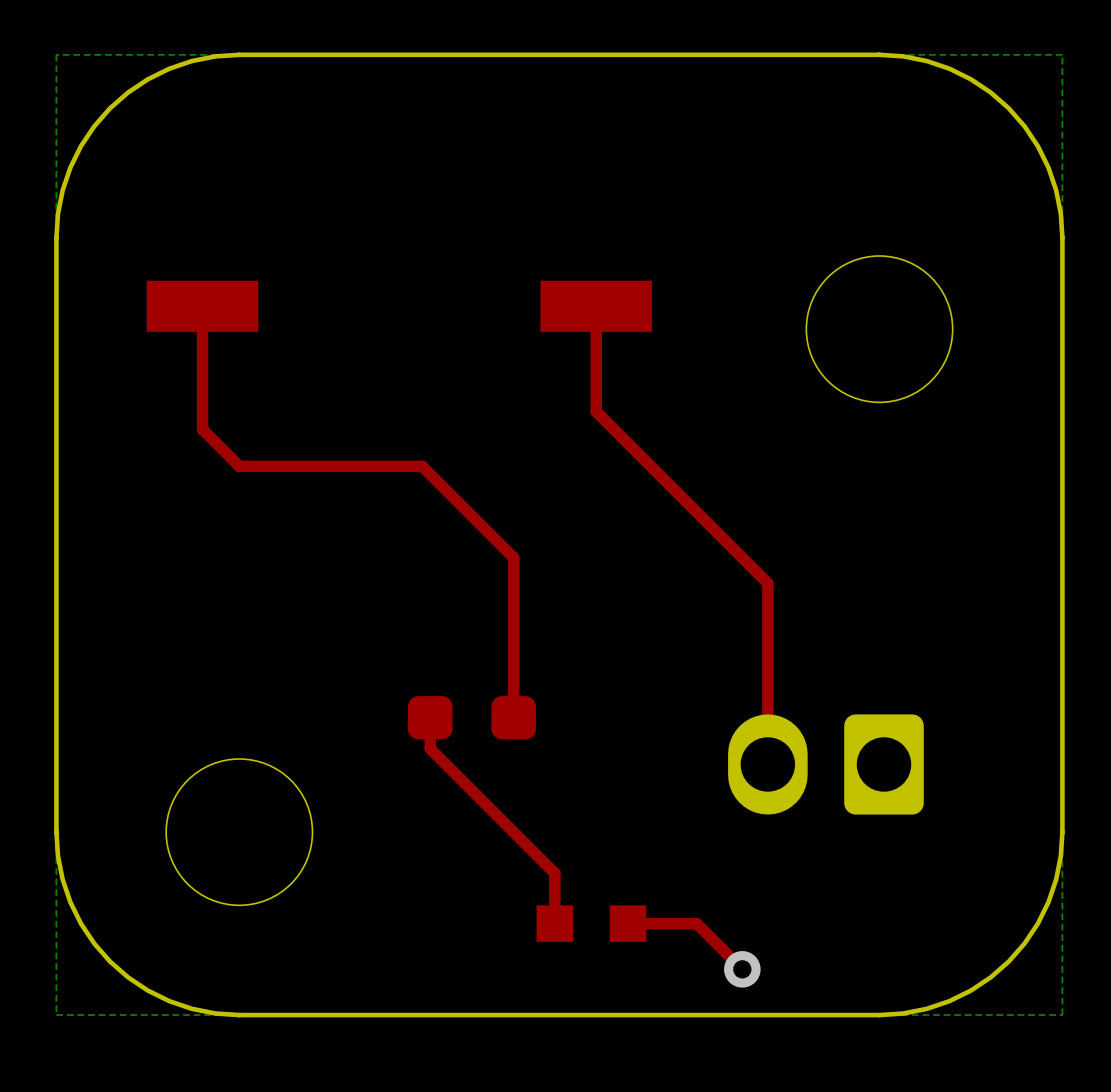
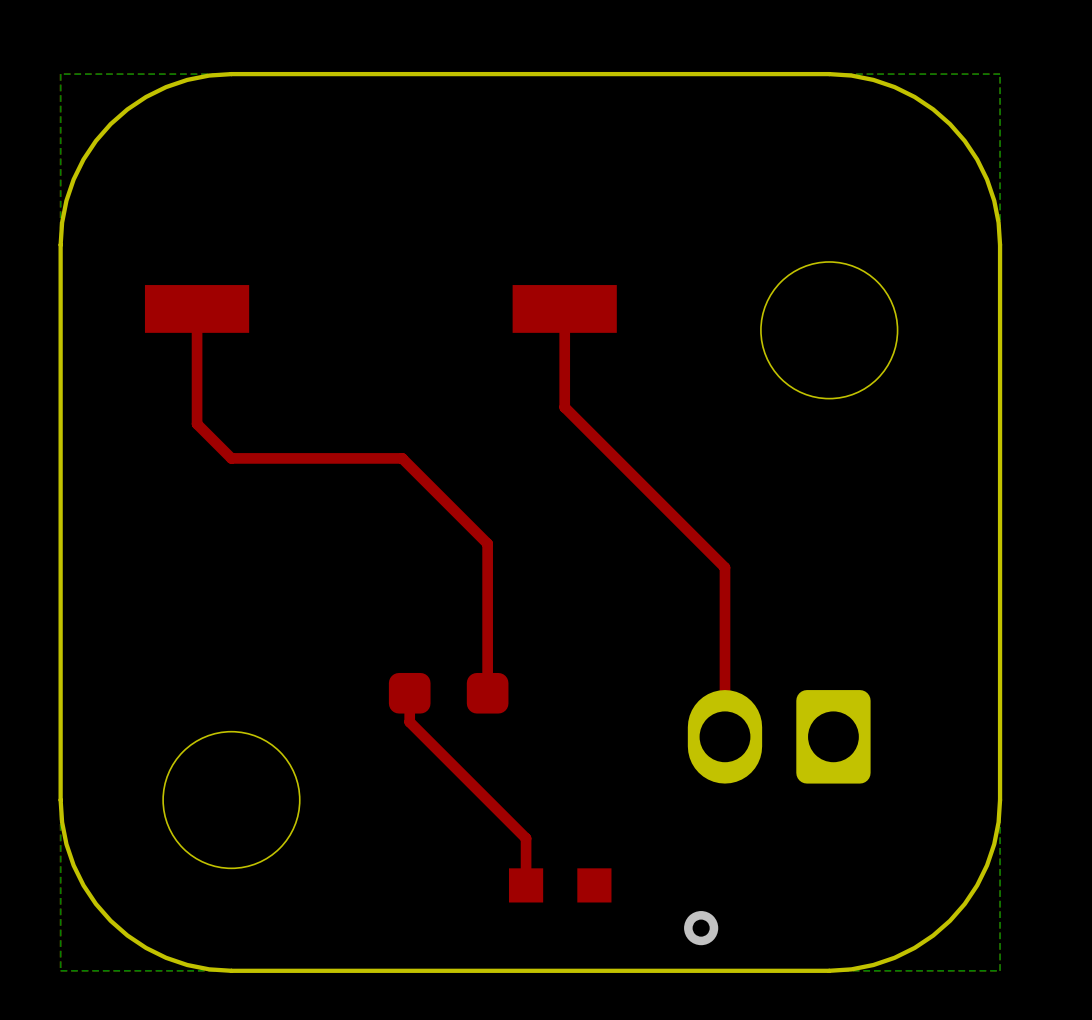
top track: (628, 923) (696, 923) (742, 969) -> none

